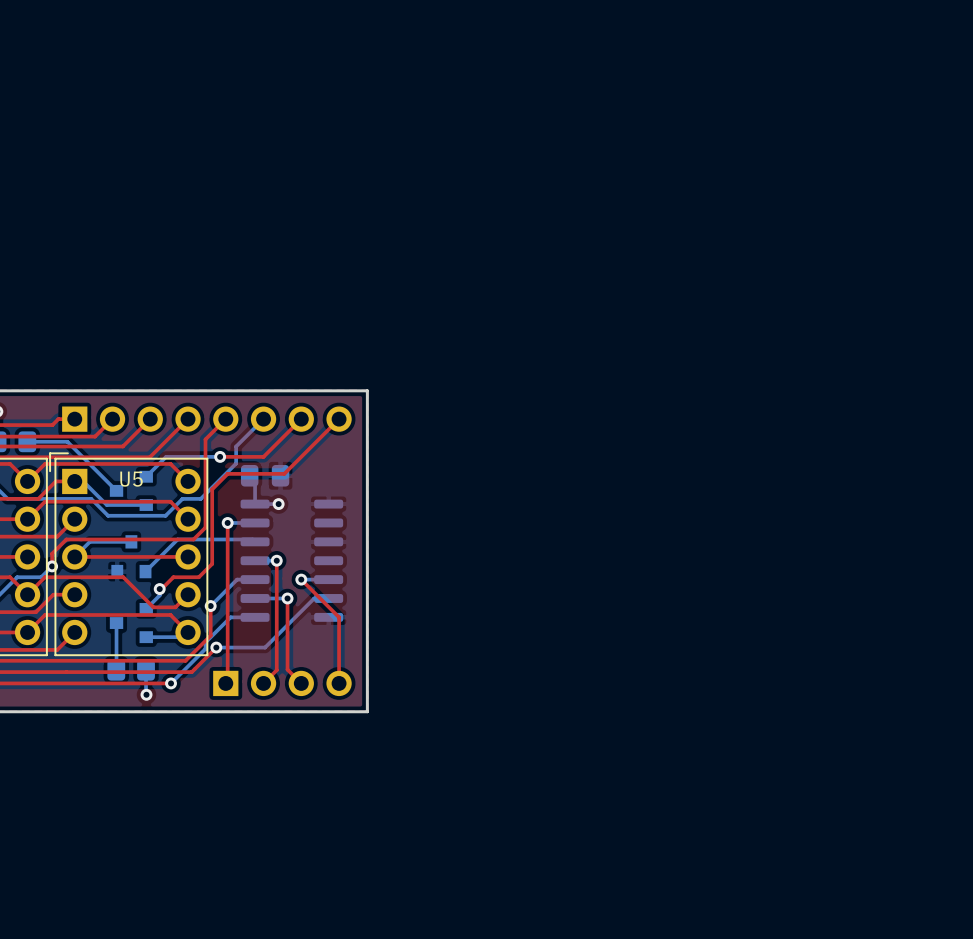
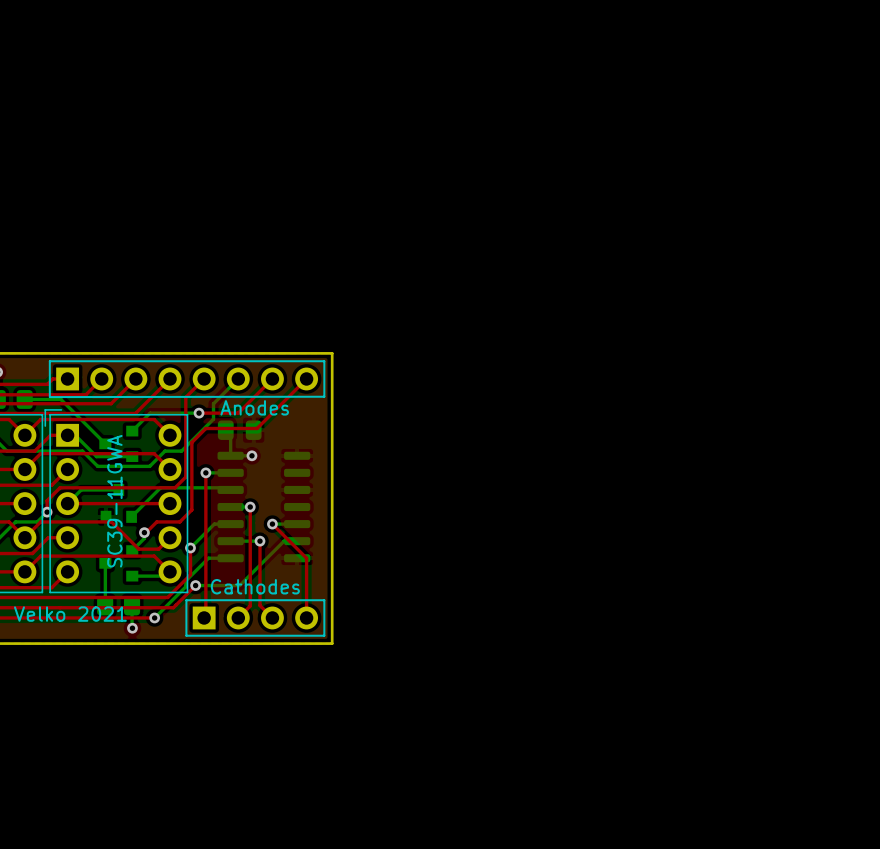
line: none -> (49, 361) (49, 397) (324, 396) (324, 361) (49, 361)
part value: none -> Anodes (254, 407)
U5 name: U5 (131, 479) -> none
U5 value: none -> SC39-11GWA (114, 501)
part value: none -> Cathodes (255, 586)
line: none -> (186, 600) (186, 635) (324, 635) (324, 600) (186, 600)
text: none -> Velko 2021 (70, 614)

